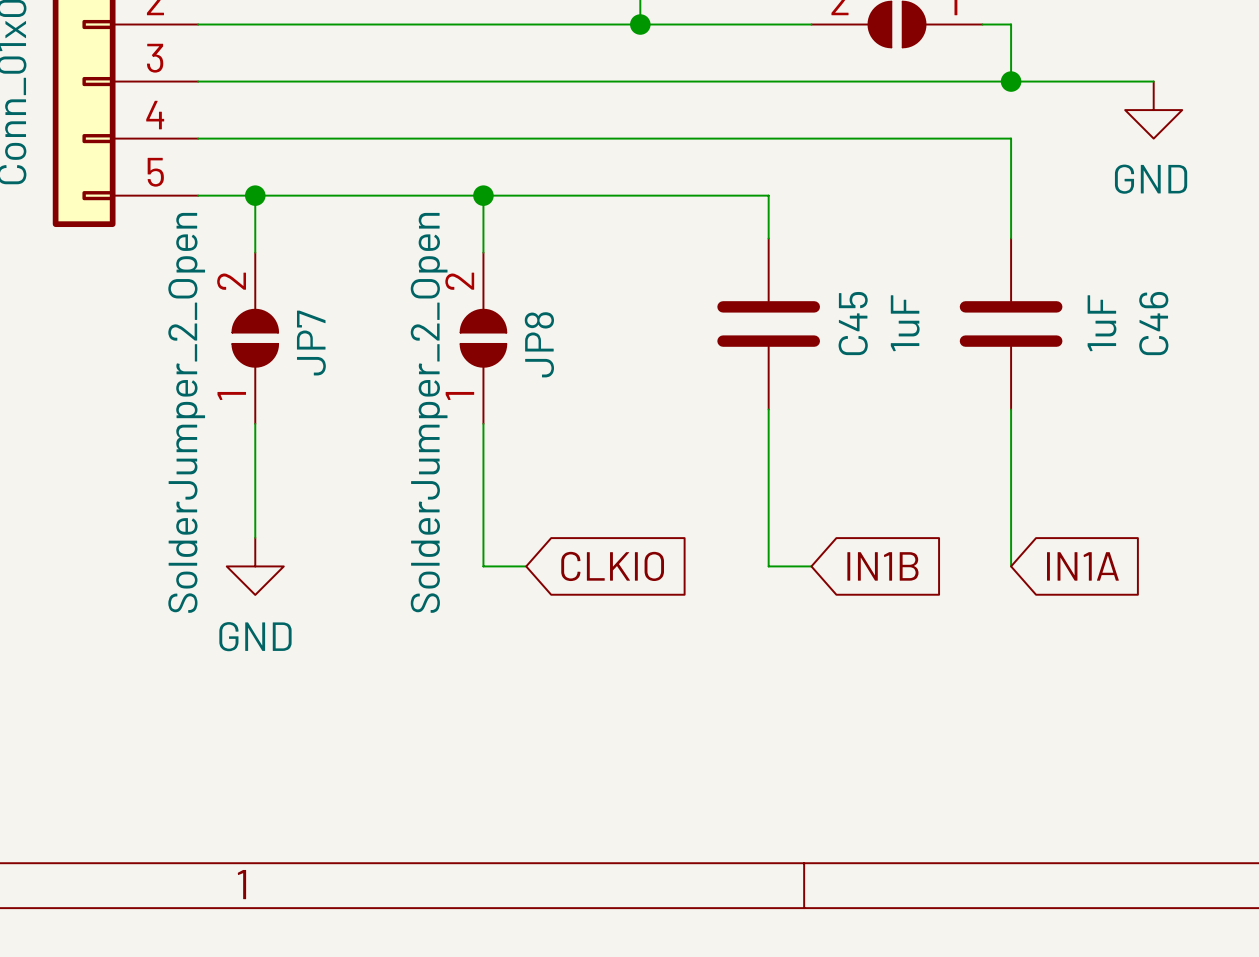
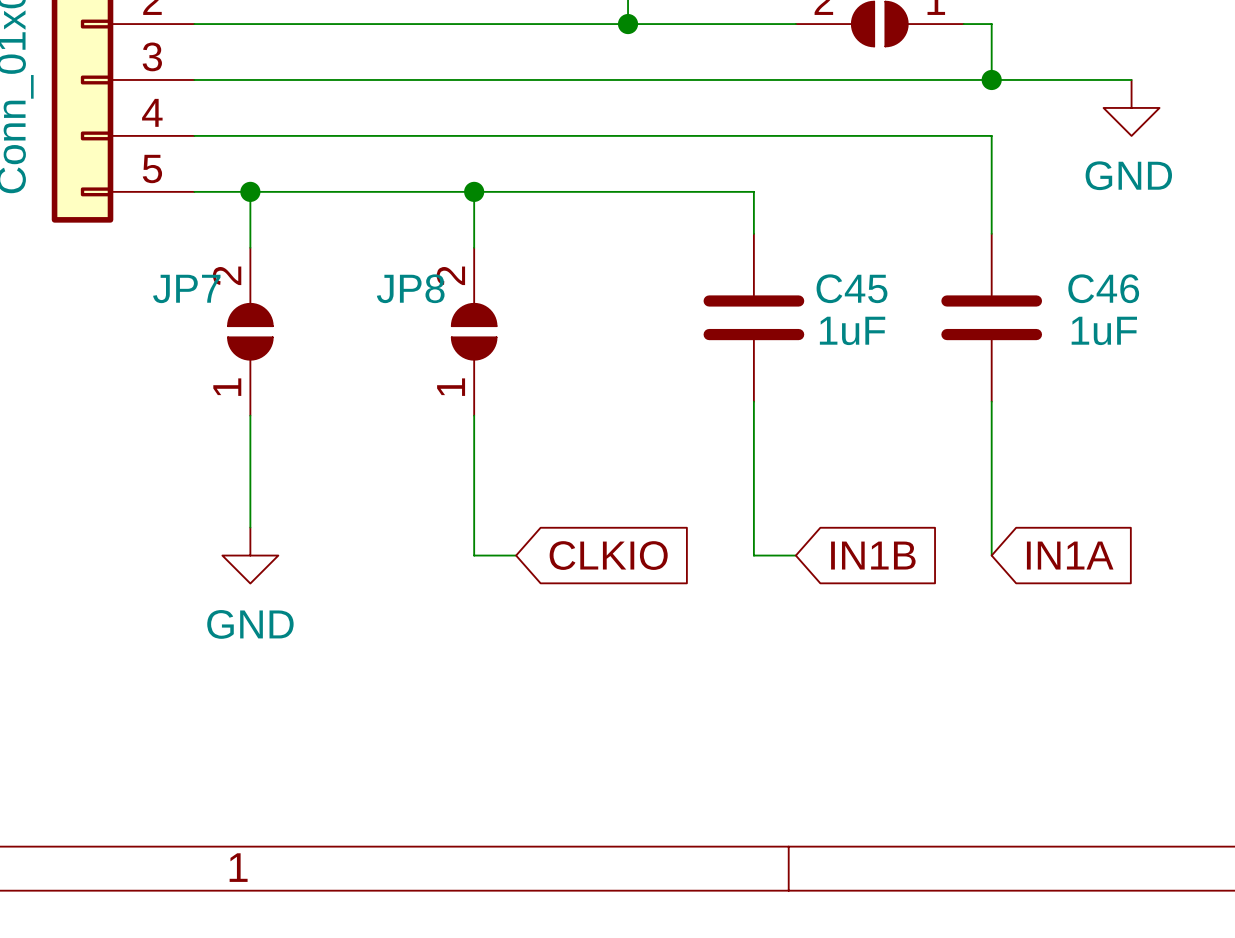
C45 name rotation: 0° (853, 323) -> 90° clockwise (852, 288)
C45 value rotation: 0° (905, 323) -> 90° clockwise (852, 330)
C46 value rotation: 0° (1102, 323) -> 90° clockwise (1104, 330)
C46 name rotation: 0° (1153, 323) -> 90° clockwise (1103, 288)
JP7 name rotation: 0° (311, 343) -> 90° clockwise (186, 288)
JP7 name position: JP7 (311, 343) -> JP7 (186, 288)
JP8 name rotation: 0° (539, 344) -> 90° clockwise (410, 288)
JP8 name position: JP8 (539, 344) -> JP8 (410, 288)
JP7 value: SolderJumper_2_Open (186, 412) -> none
JP8 value: SolderJumper_2_Open (429, 412) -> none

